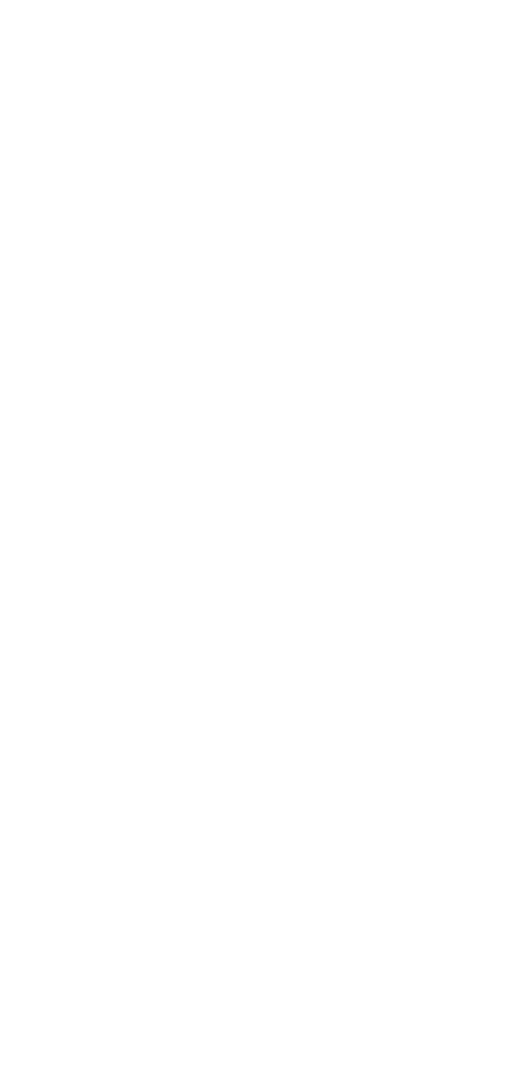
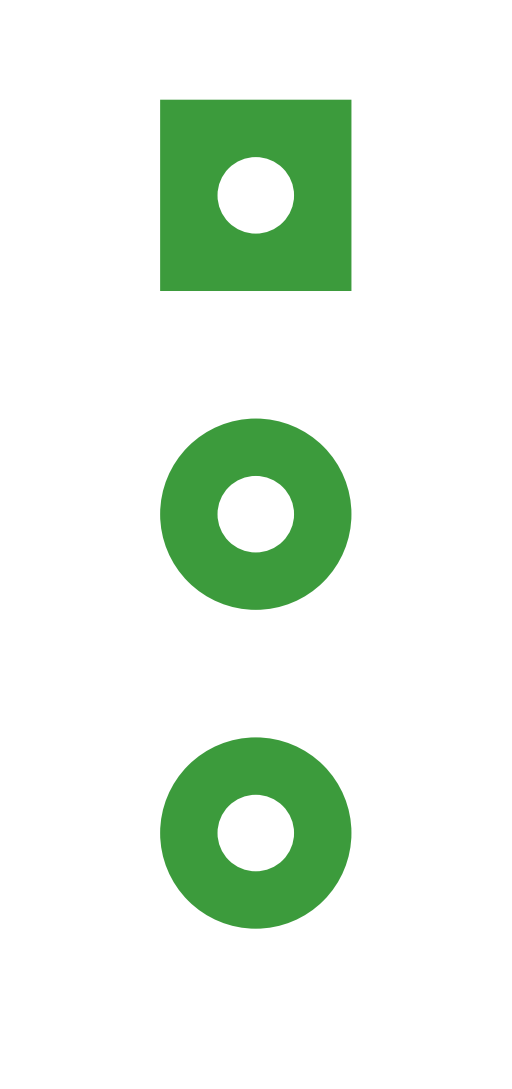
part: none -> (255, 514)

